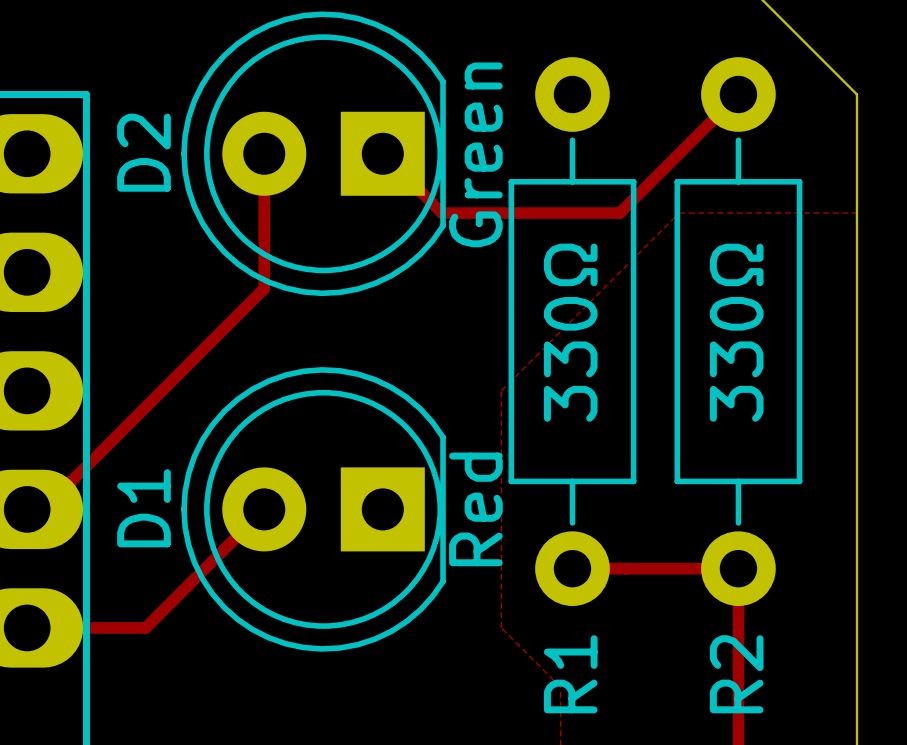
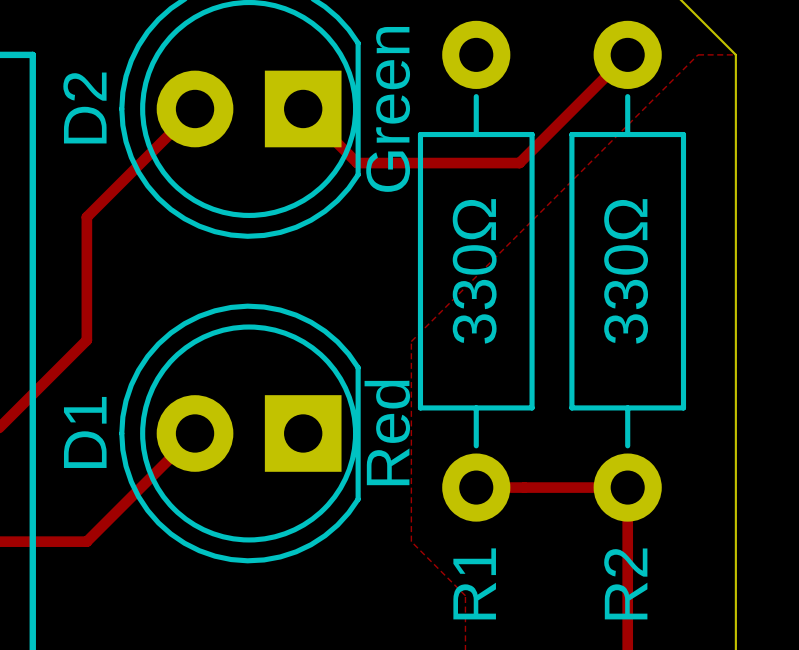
track: (264, 153) (264, 288) (145, 407) -> (195, 108) (86, 217) (86, 340)
zone outline: (856, 213) (679, 213) (501, 390) (501, 408) -> (735, 163) (735, 54) (698, 54) (411, 341)

